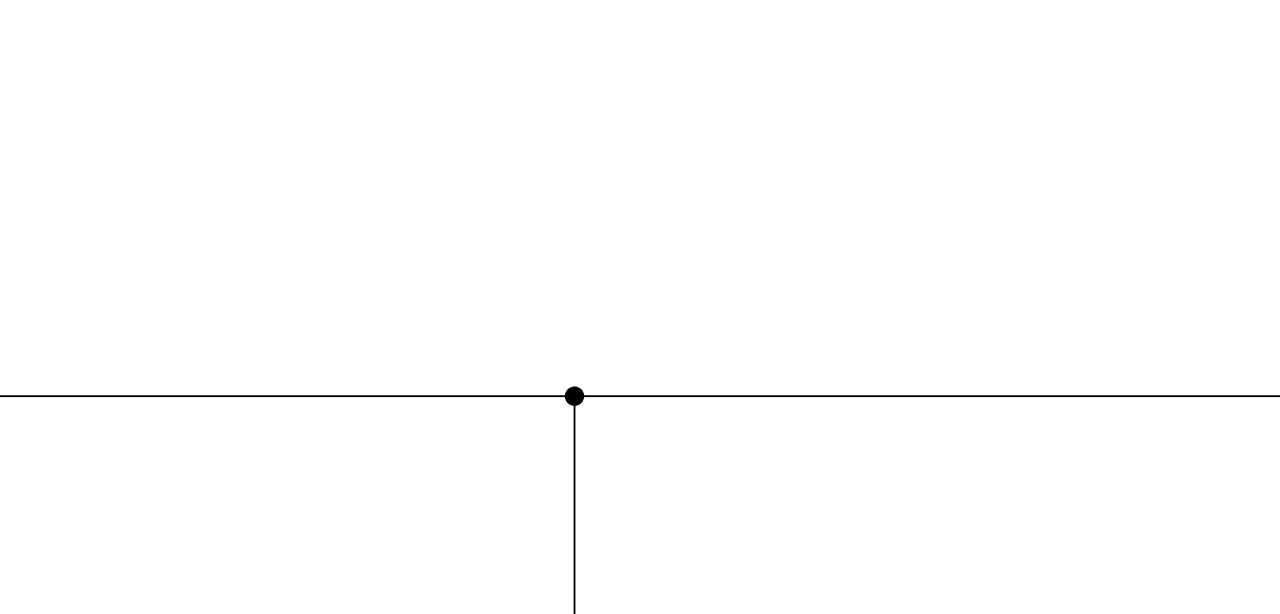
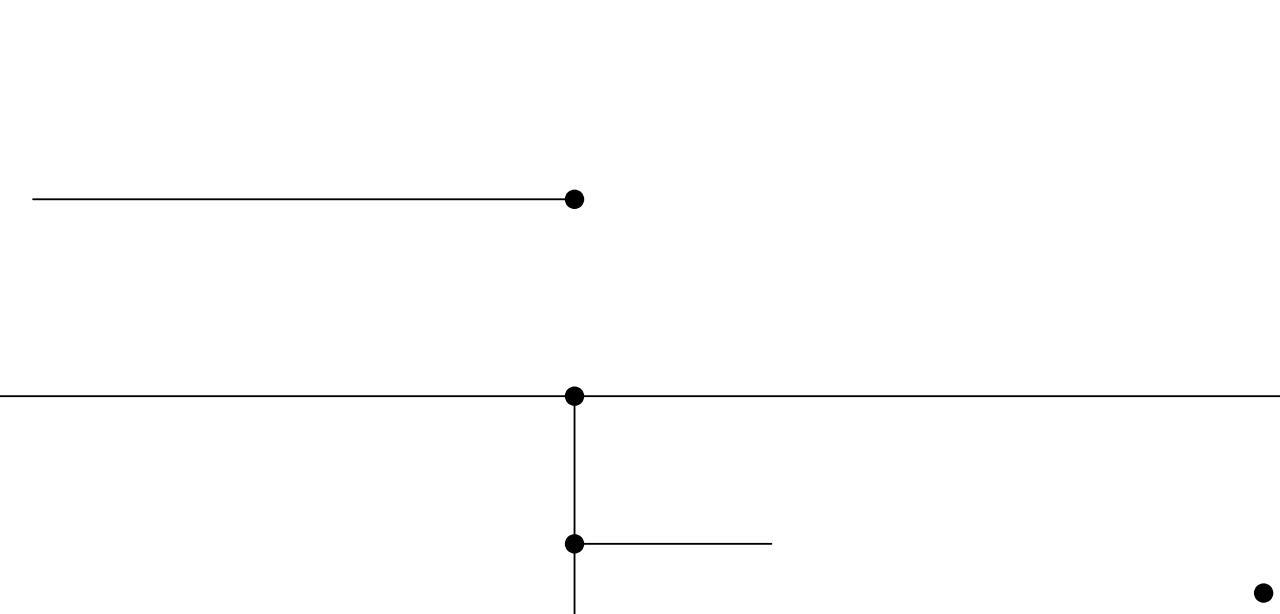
wire: none -> (33, 199) (574, 199)
junction: none -> (574, 199)
wire: none -> (574, 543) (771, 543)
junction: none -> (574, 543)
junction: none -> (1263, 593)

